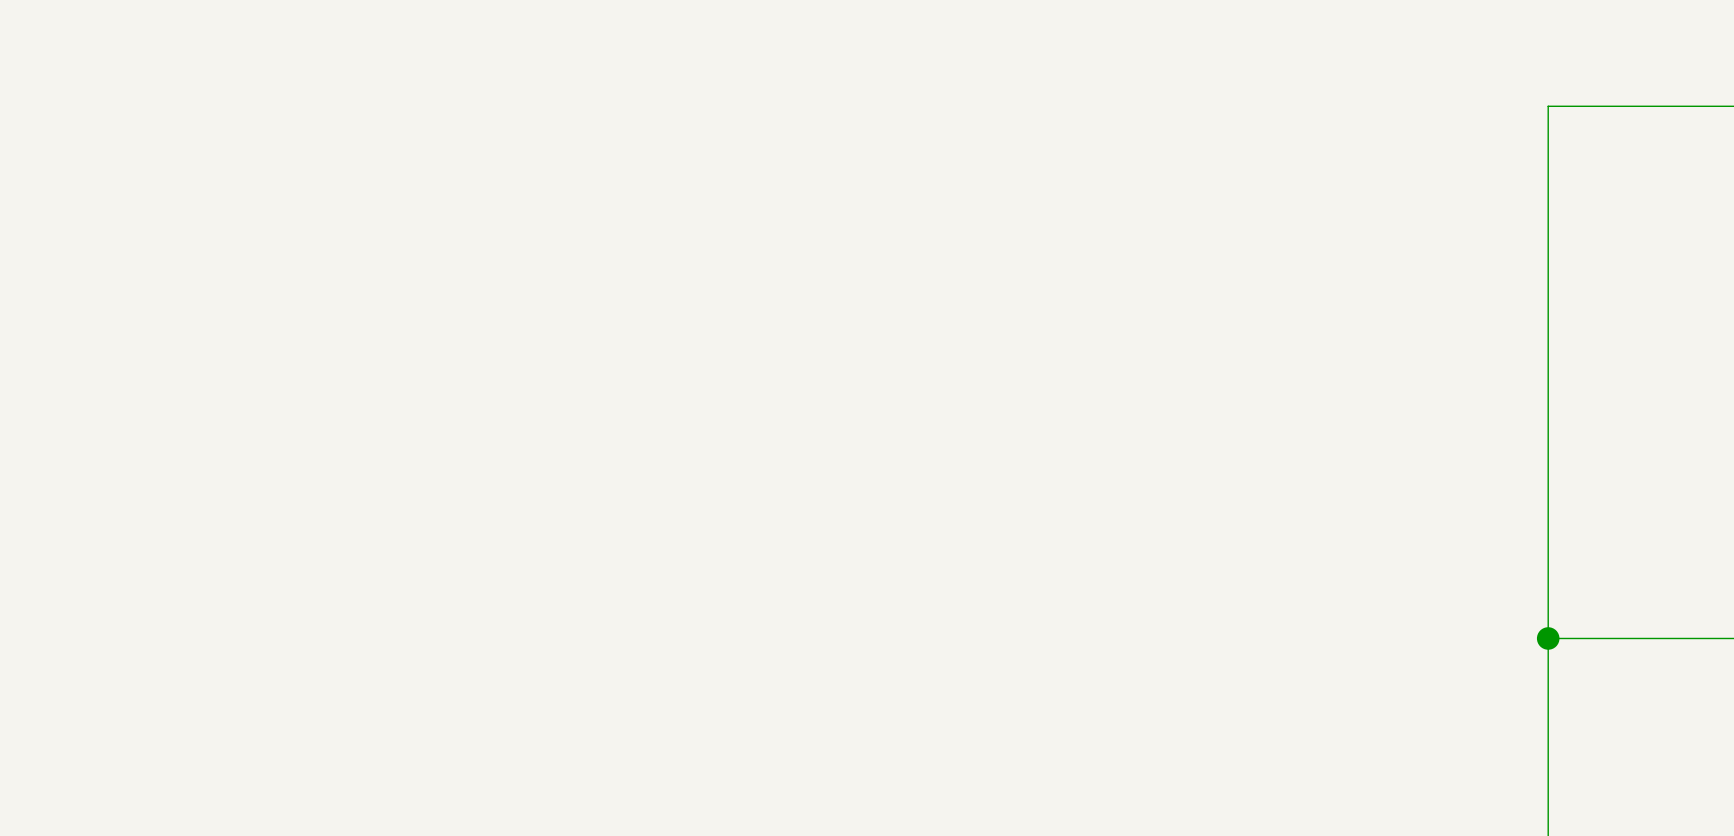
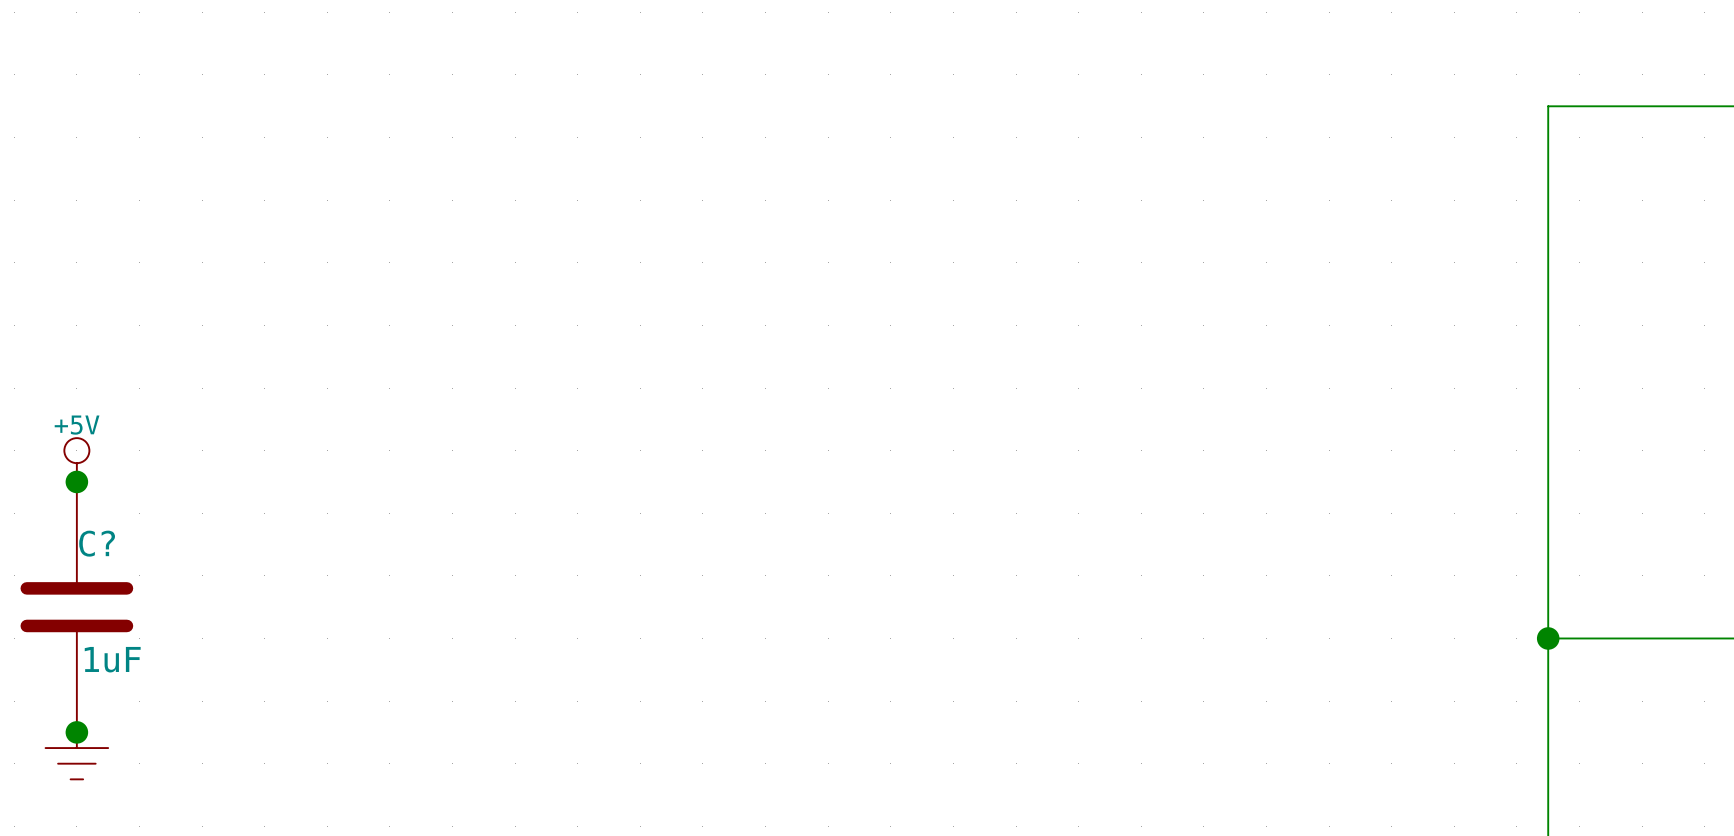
power symbol: none -> +5V (76, 460)
junction: none -> (76, 481)
C?: none -> 1uF (76, 607)
junction: none -> (76, 732)
power symbol: none -> (76, 755)

